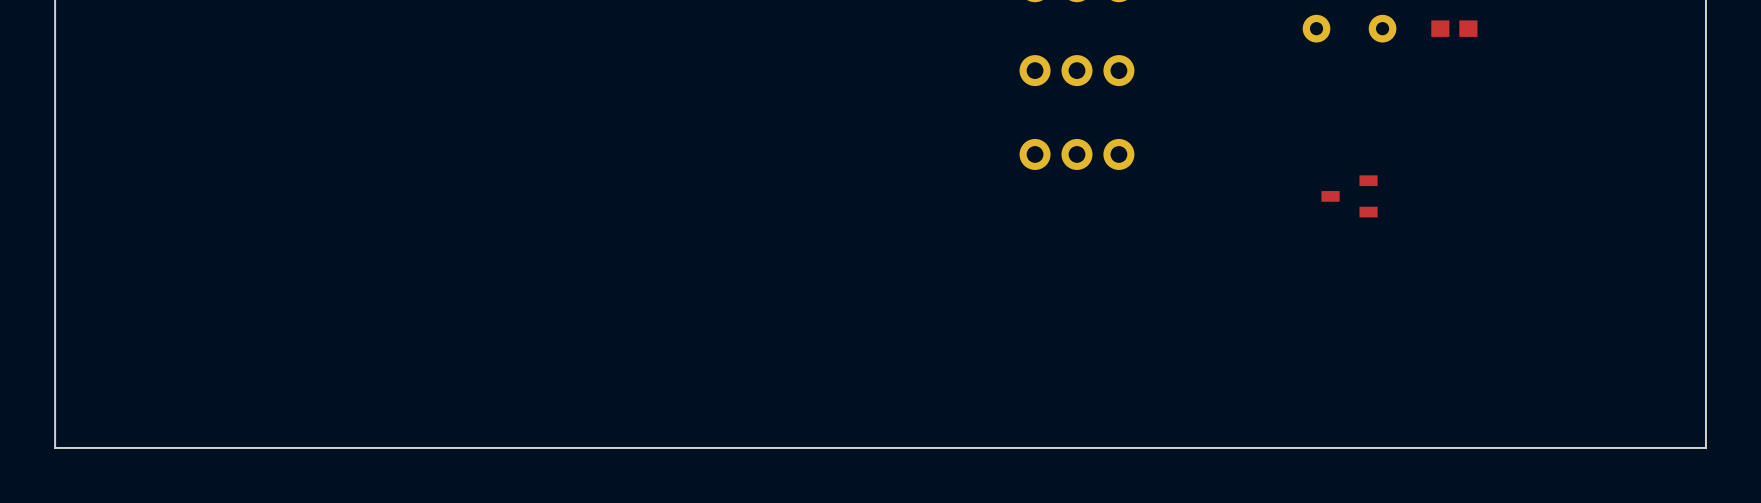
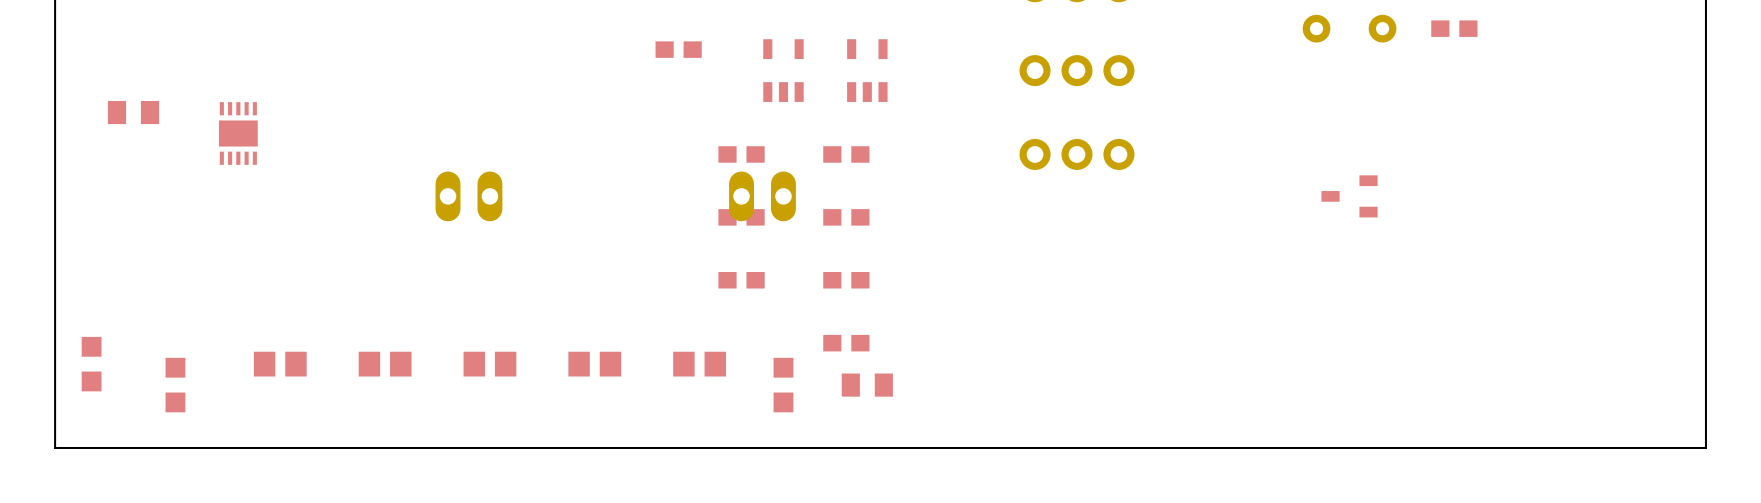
part: none -> (678, 49)
part: none -> (783, 70)
part: none -> (867, 70)
part: none -> (133, 112)
part: none -> (238, 133)
part: none -> (741, 154)
part: none -> (846, 154)
part: none -> (468, 196)
part: none -> (762, 196)
part: none -> (741, 217)
part: none -> (846, 217)
part: none -> (741, 280)
part: none -> (846, 280)
part: none -> (846, 343)
part: none -> (91, 364)
part: none -> (280, 364)
part: none -> (385, 364)
part: none -> (489, 364)
part: none -> (594, 364)
part: none -> (699, 364)
part: none -> (175, 385)
part: none -> (783, 385)
part: none -> (867, 385)

